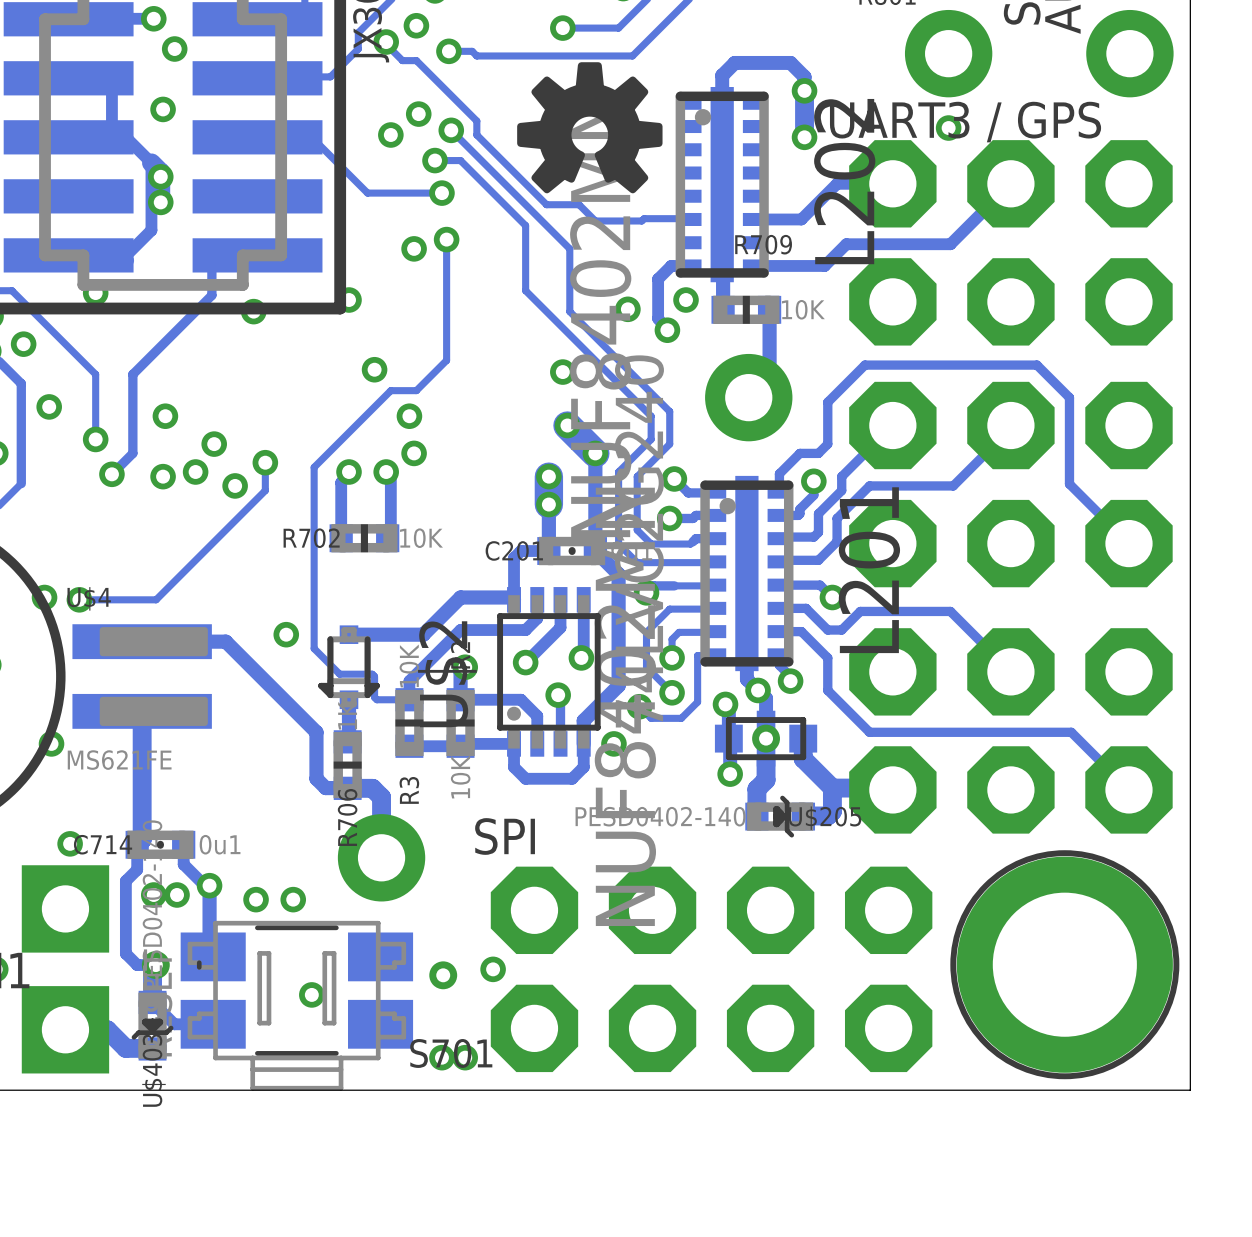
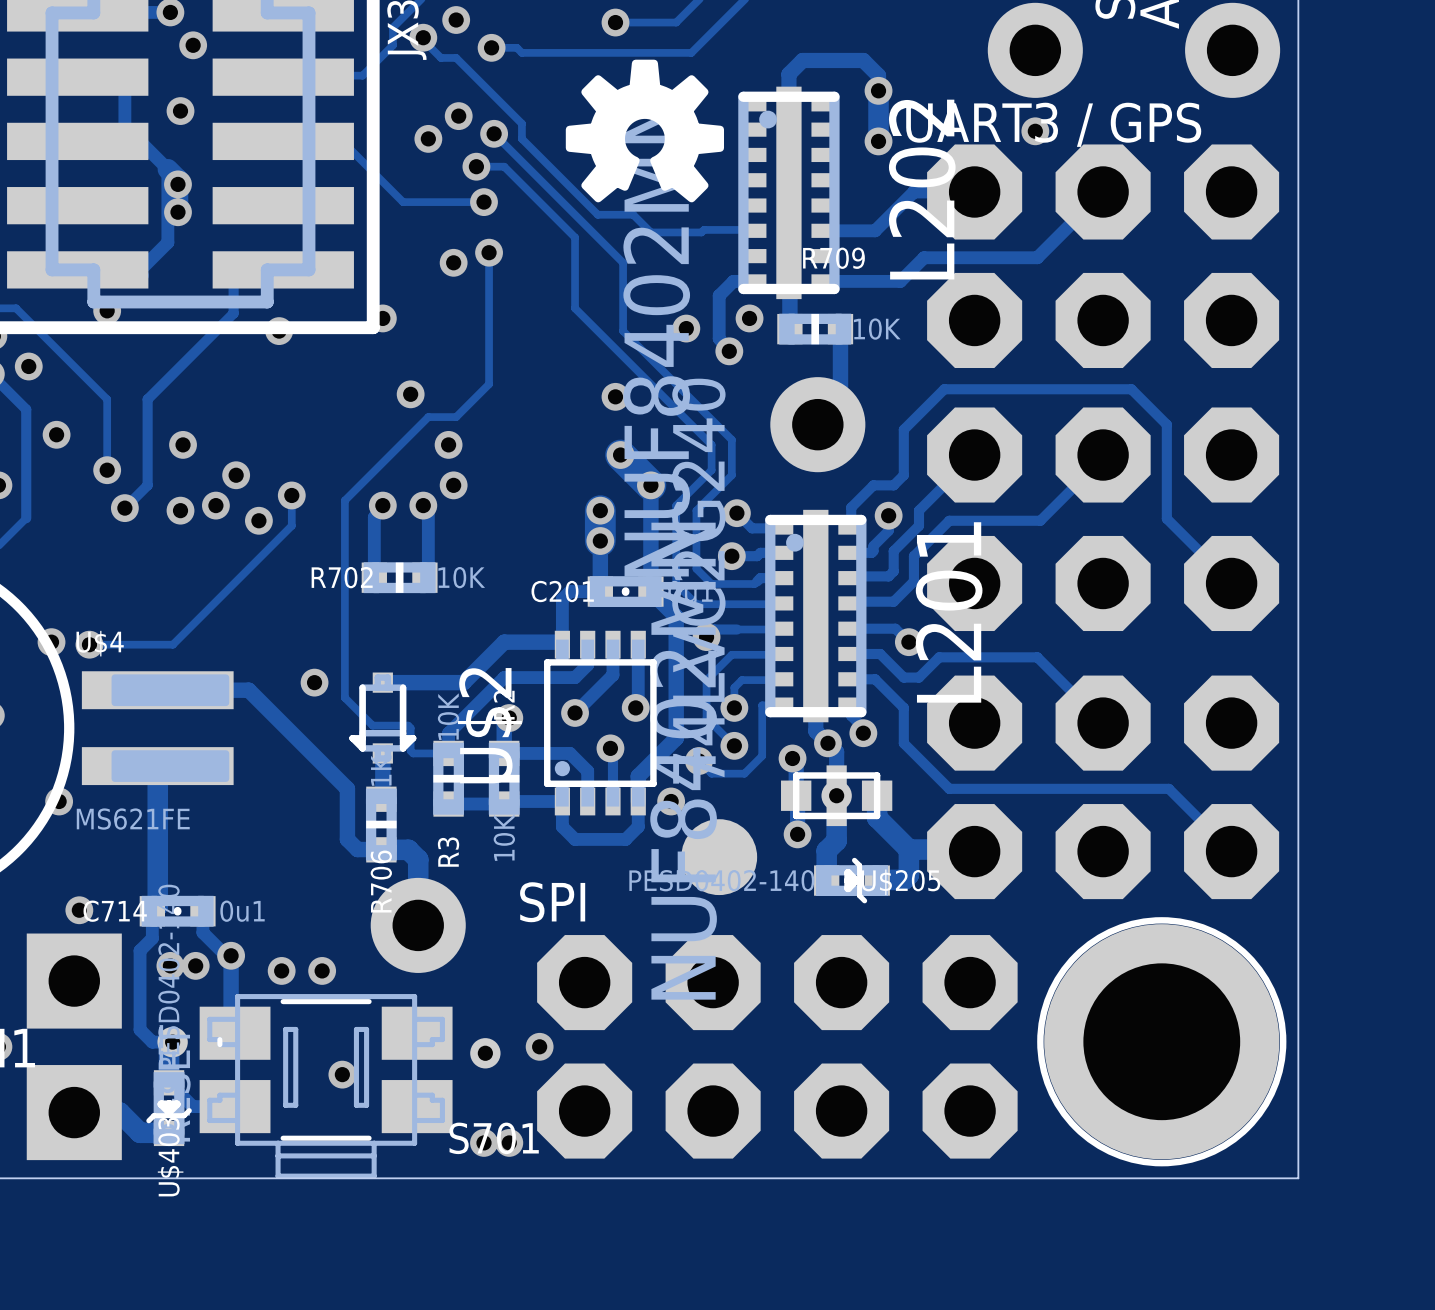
part: none -> (719, 857)

